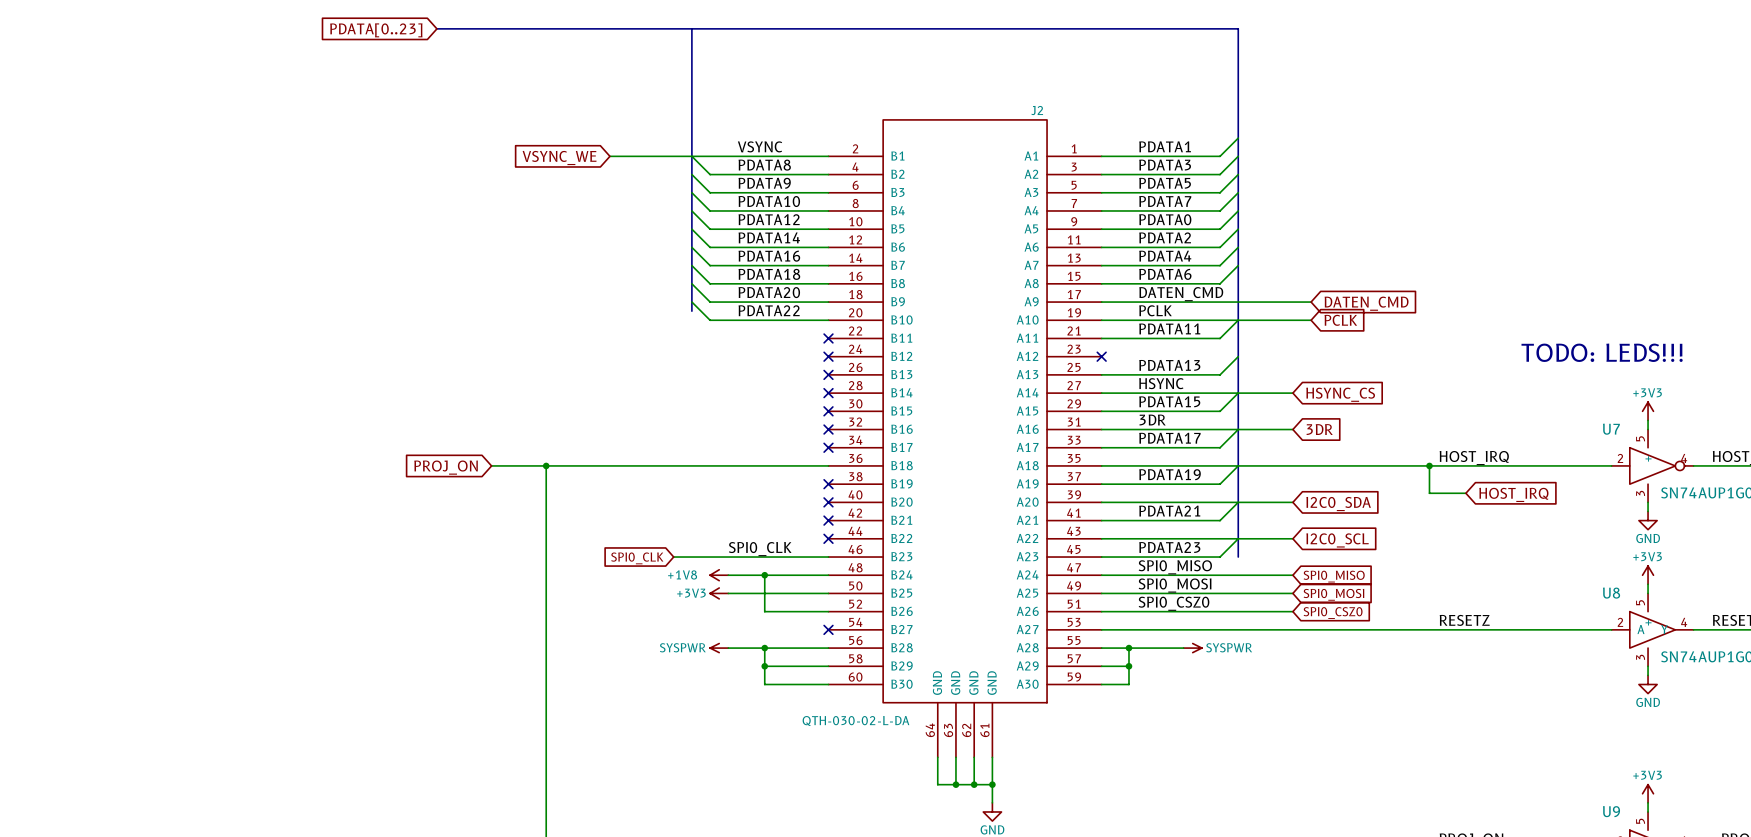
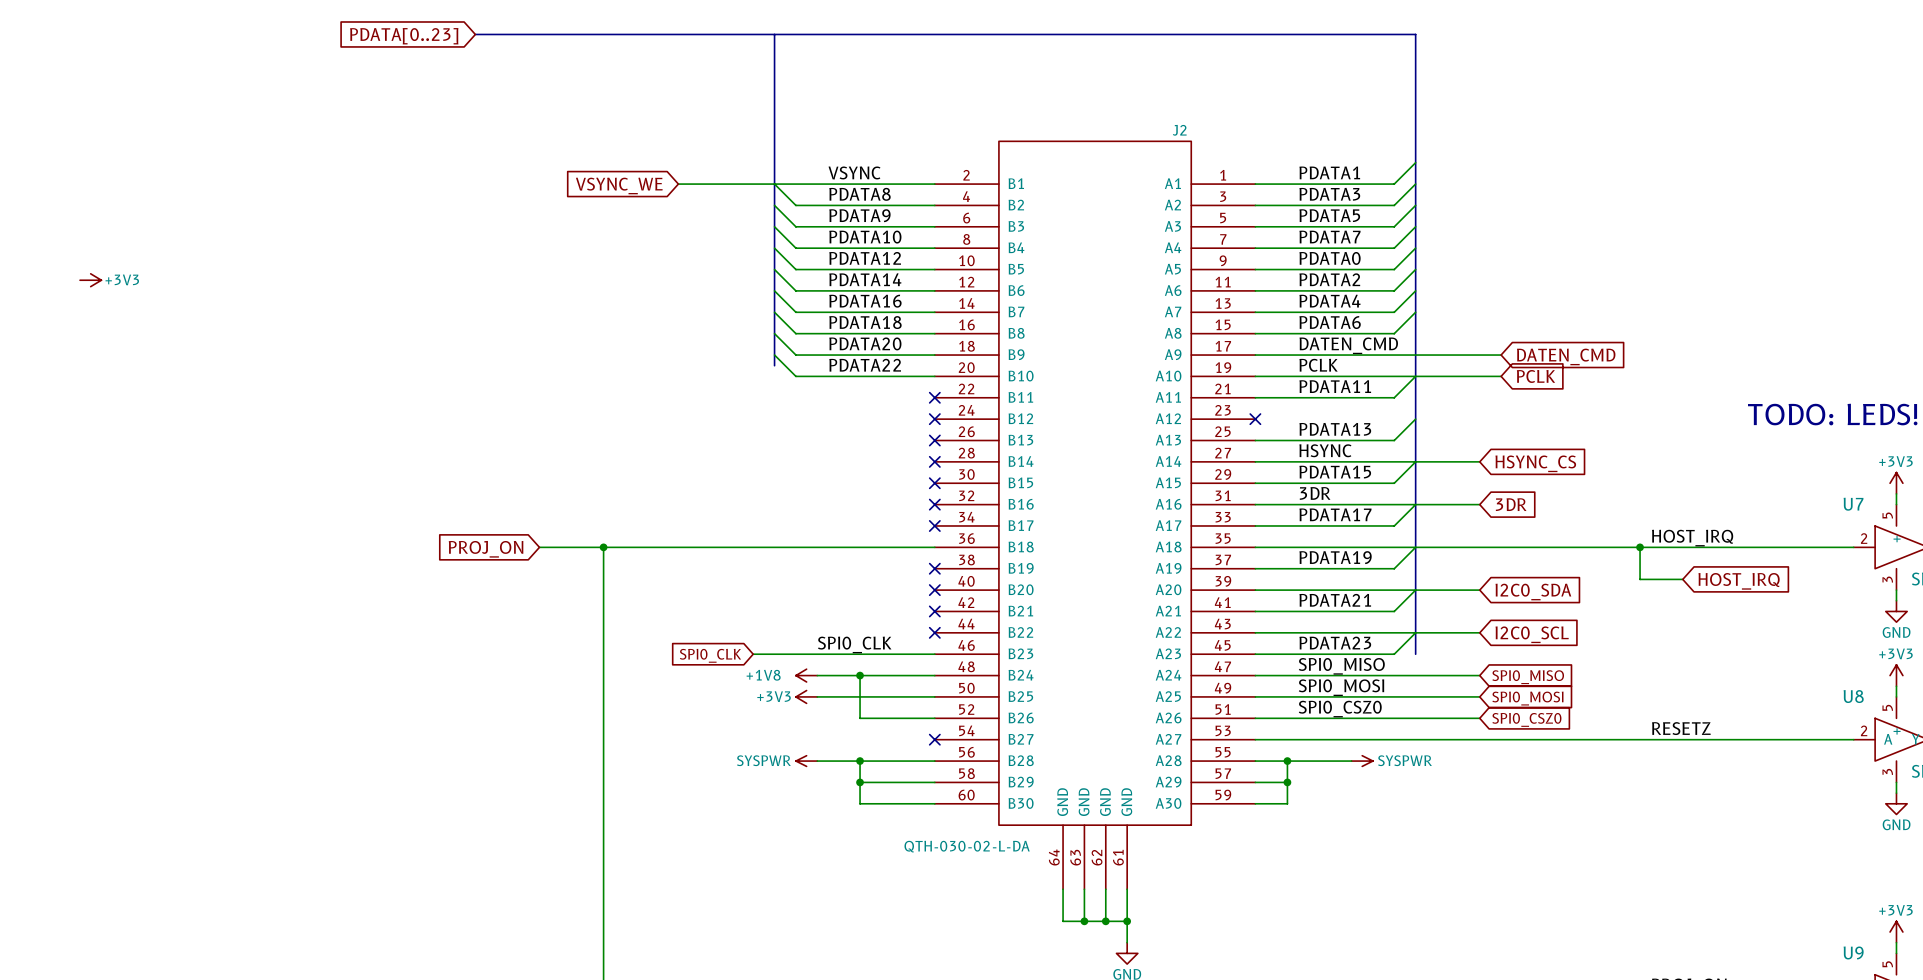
power symbol: none -> +3V3 (90, 280)

